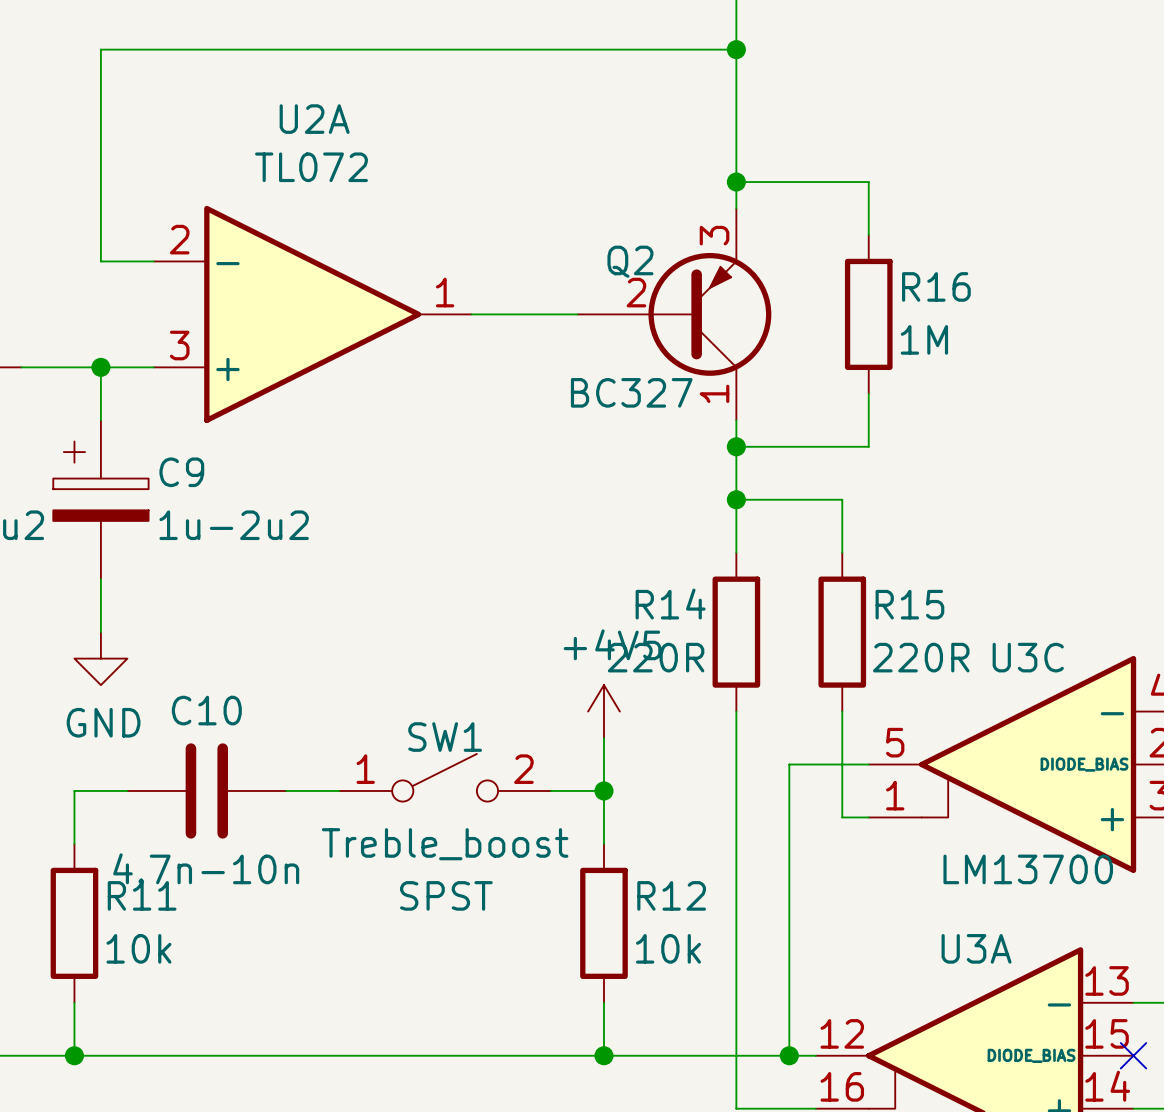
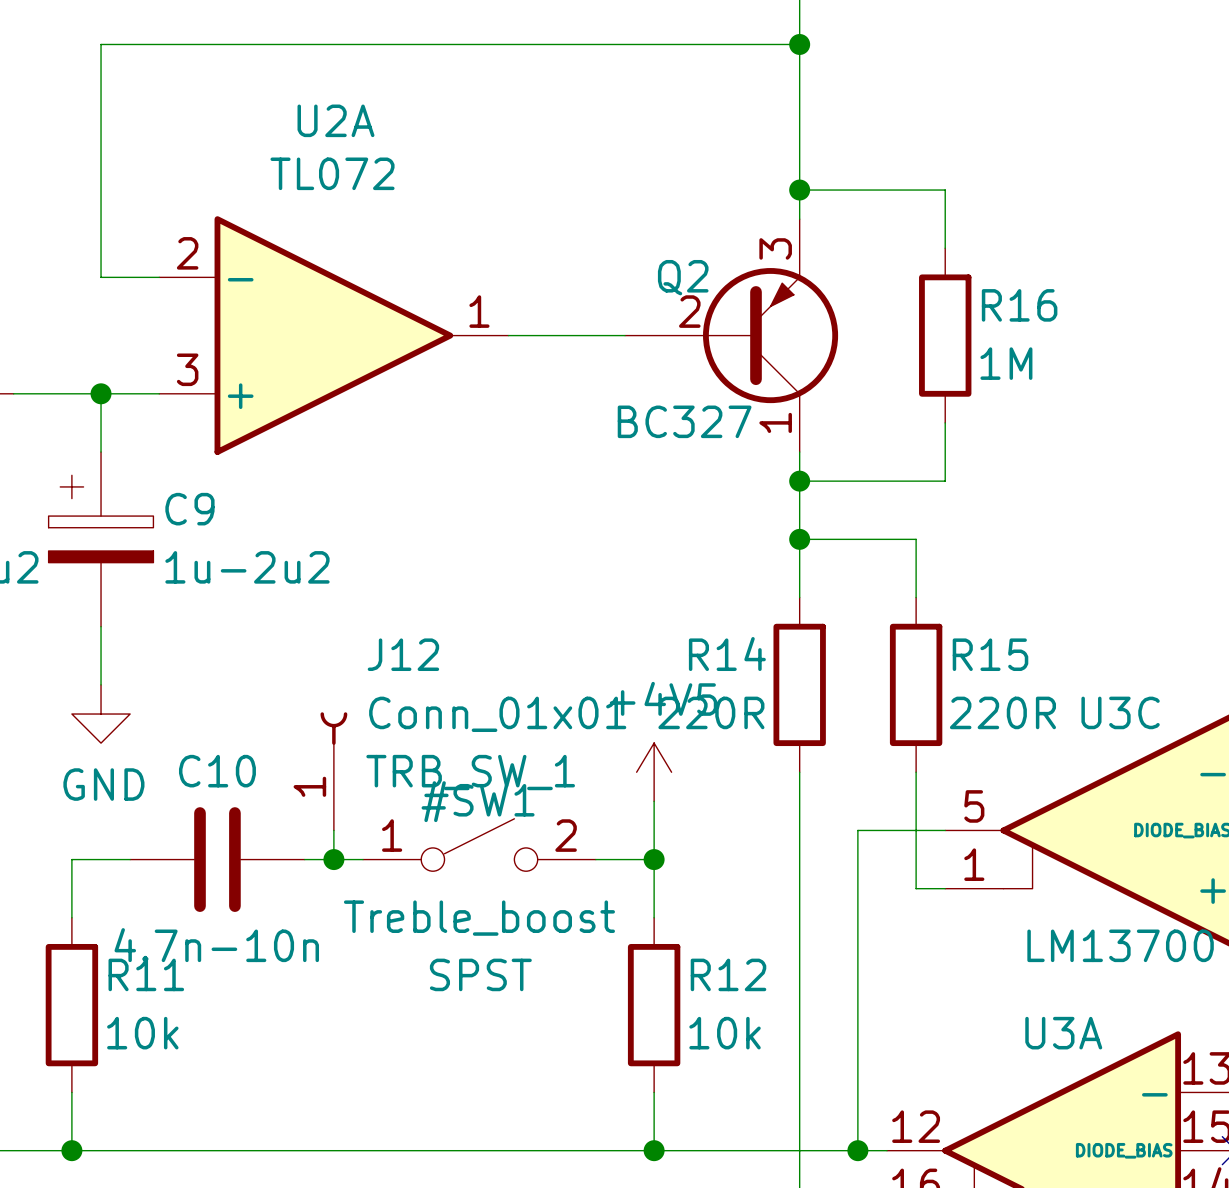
J12: none -> Conn_01x01 (333, 771)
wire: none -> (333, 830) (333, 859)
SW1: SPST (445, 777) -> none
#SW1: none -> SPST (479, 845)
junction: none -> (333, 859)

